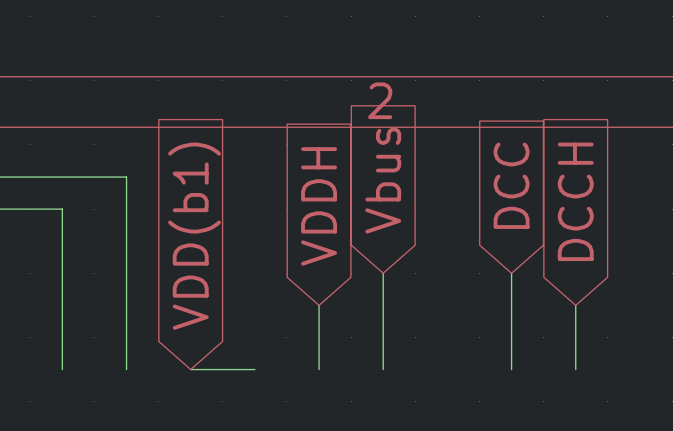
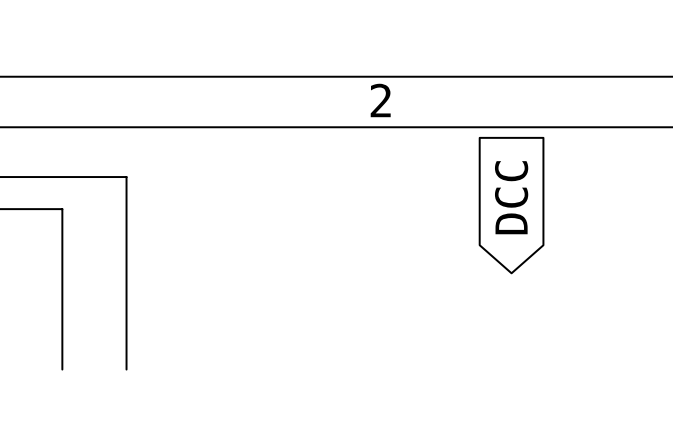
global label: Vbus (383, 180) -> none
global label: DCCH (575, 201) -> none
global label: VDDH (319, 206) -> none
global label: VDD(b1) (194, 236) -> none
wire: (383, 273) (383, 369) -> none
wire: (511, 273) (511, 369) -> none
wire: (319, 305) (319, 369) -> none
wire: (575, 305) (575, 369) -> none
wire: (190, 369) (254, 369) -> none

